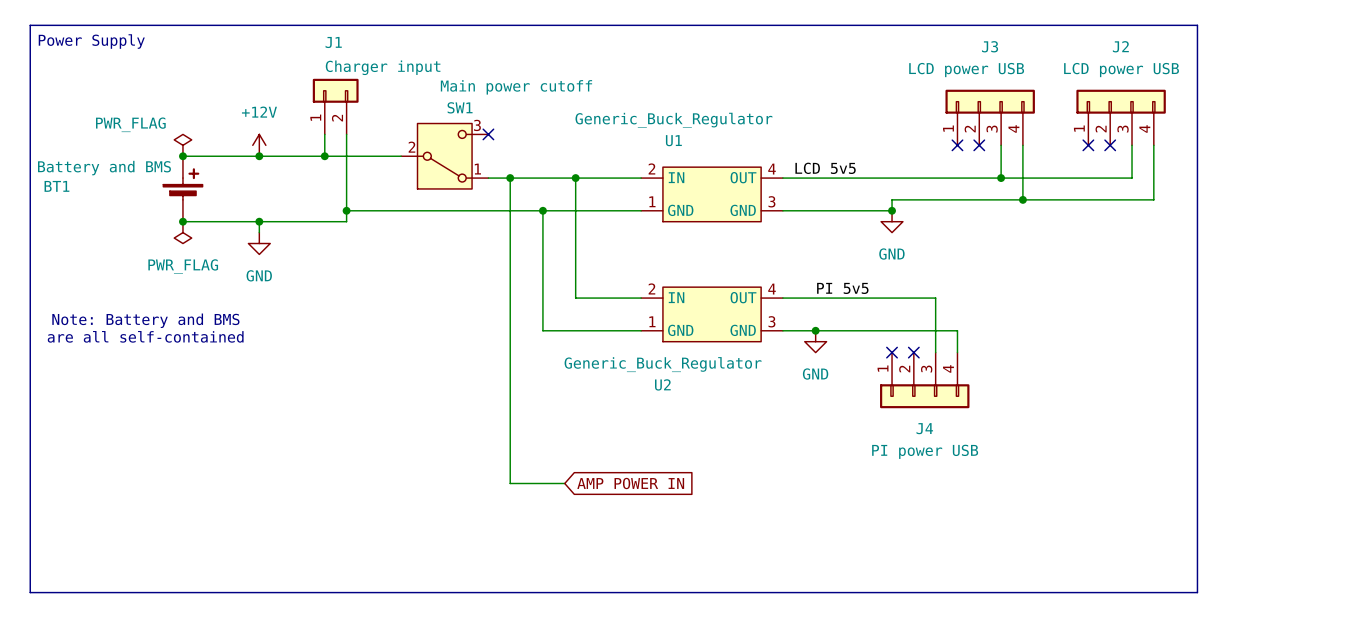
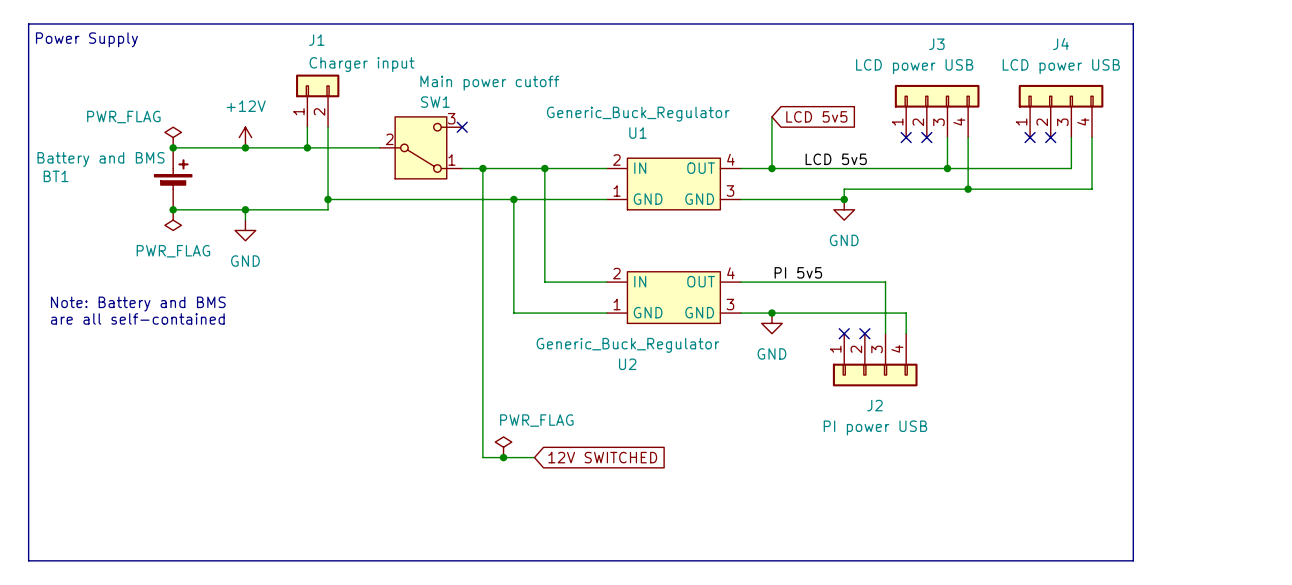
J2 name: J2 (1120, 46) -> J4 (1061, 44)
wire: none -> (771, 116) (771, 168)
global label: none -> LCD 5v5 (816, 116)
label position: LCD 5v5 (825, 168) -> LCD 5v5 (836, 159)
junction: none -> (771, 168)
J4 name: J4 (924, 428) -> J2 (874, 405)
power symbol: none -> PWR_FLAG (503, 447)
junction: none -> (503, 457)
global label: AMP POWER IN (630, 483) -> 12V SWITCHED (602, 457)

